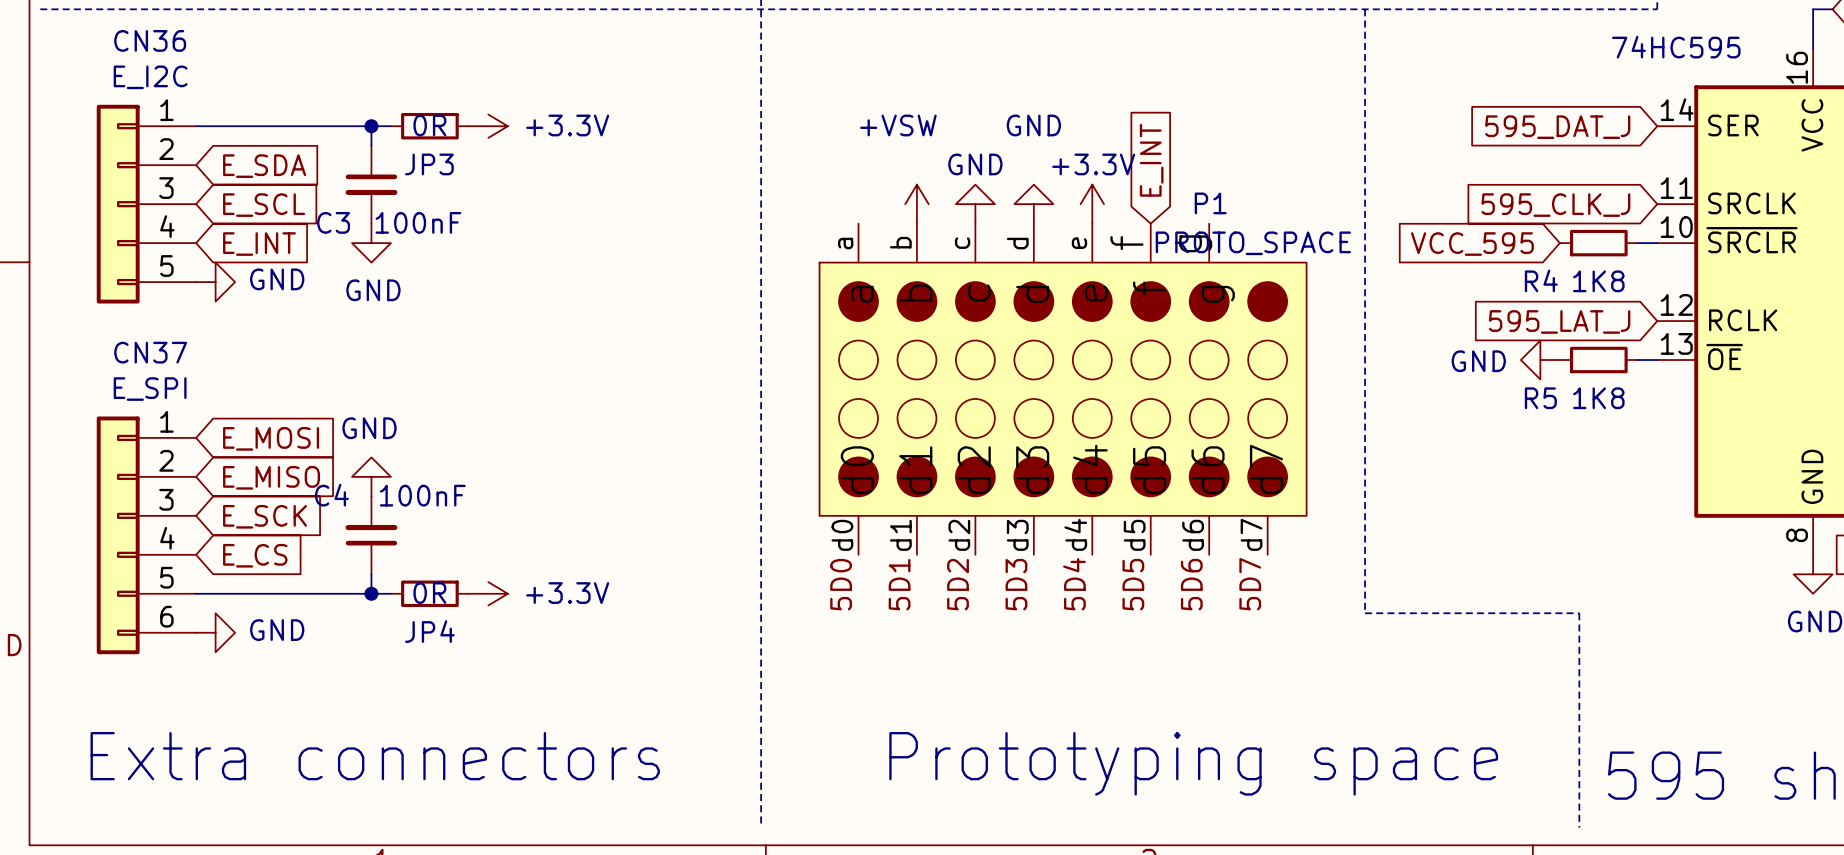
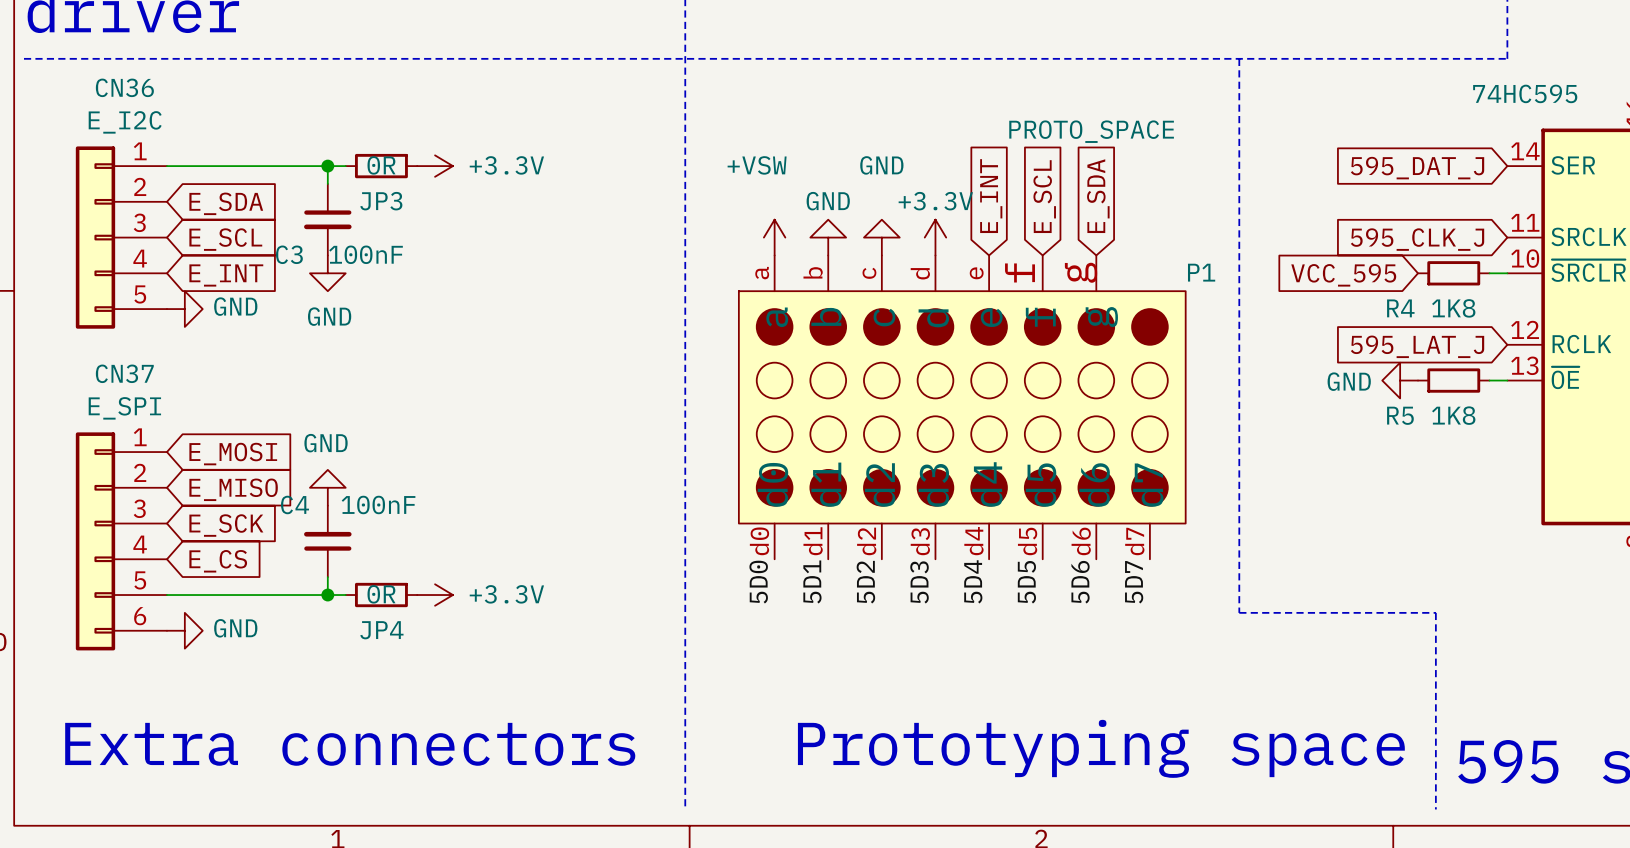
global label: none -> E_SDA (1098, 196)
global label: none -> E_INT (991, 196)
global label: E_INT (1151, 160) -> E_SCL (1044, 196)
power symbol text position: GND (975, 164) -> GND (881, 165)
P1 name position: P1 (1210, 203) -> P1 (1201, 272)
power symbol: none -> +VSW (774, 237)
power symbol: +VSW (916, 204) -> GND (828, 237)
power symbol: GND (1033, 204) -> +3.3V (935, 237)
power symbol: +3.3V (1092, 204) -> none
P1 value position: PROTO_SPACE (1253, 243) -> PROTO_SPACE (1091, 131)

